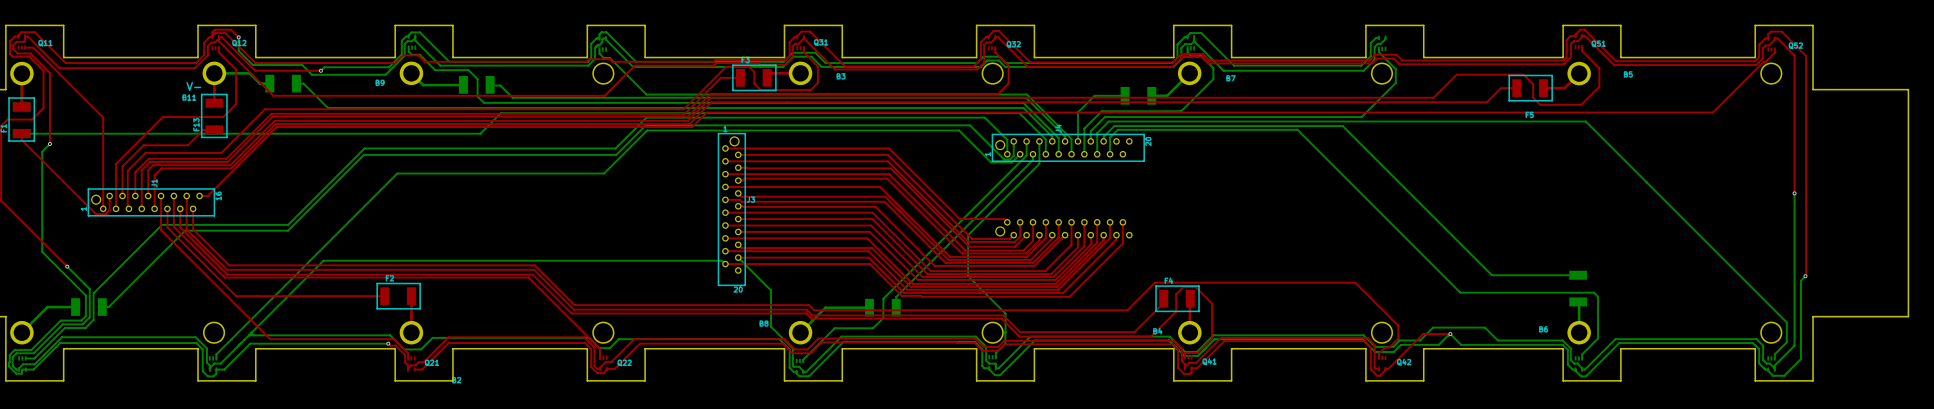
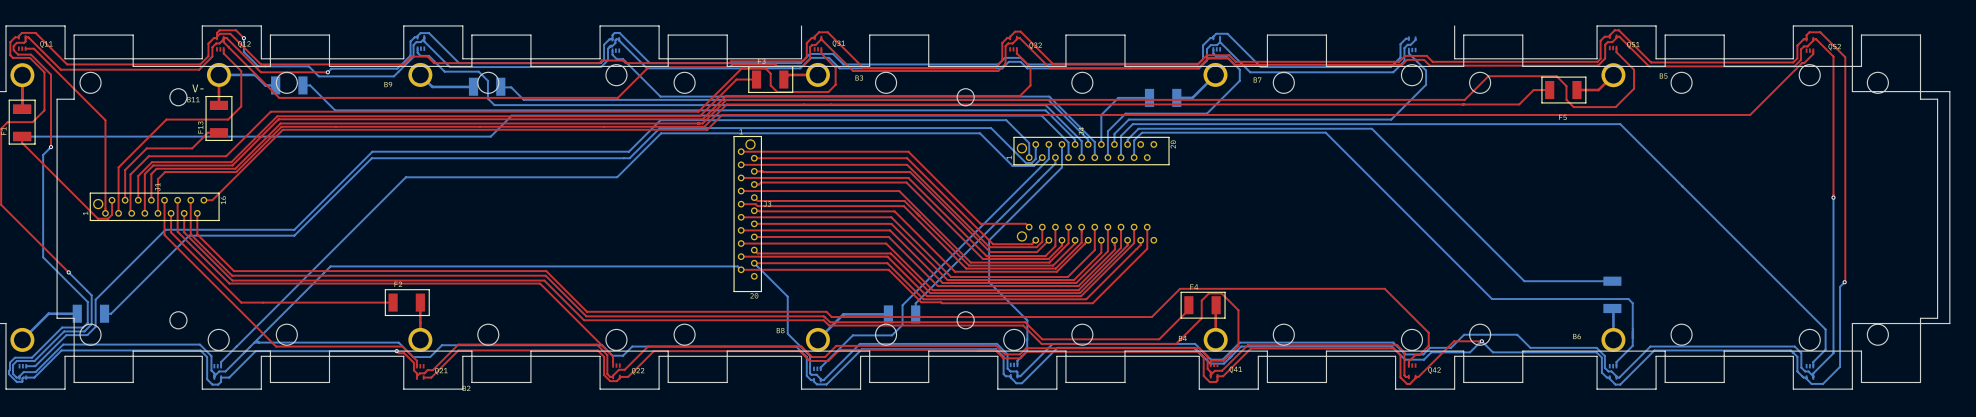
board edge: (784, 25) (842, 25) (842, 57) (976, 57) (976, 25) (1034, 25) (1034, 57) (1173, 57) (1173, 25) (1231, 25) (1231, 57) (1365, 57) (1365, 25) (1423, 25) -> none
board edge: none -> (74, 35) (133, 35) (133, 66) (270, 66) (270, 35) (329, 35) (329, 66) (471, 66) (471, 35) (530, 35) (530, 66) (668, 66) (668, 35) (727, 35) (727, 66) (869, 66) (869, 35) (928, 35) (928, 66) (1065, 66) (1065, 35) (1125, 35) (1125, 66) (1267, 66) (1267, 35) (1326, 35) (1326, 66) (1463, 66) (1463, 35) (1522, 35) (1522, 66) (1665, 66) (1665, 35) (1724, 35) (1724, 66) (1861, 66) (1861, 35) (1920, 35) (1920, 99) (1937, 99) (1937, 318) (1920, 318) (1920, 382) (1861, 382) (1861, 351) (1724, 351) (1724, 382) (1665, 382) (1665, 351) (1522, 351) (1522, 382) (1463, 382) (1463, 351) (1326, 351) (1326, 382) (1267, 382) (1267, 351) (1125, 351) (1125, 382) (1065, 382) (1065, 351) (928, 351) (928, 382) (869, 382) (869, 351) (727, 351) (727, 382) (668, 382) (668, 351) (530, 351) (530, 382) (471, 382) (471, 351) (329, 351) (329, 382) (270, 382) (270, 351) (133, 351) (133, 382) (74, 382) (74, 318) (57, 318) (57, 99) (74, 99) (74, 35)
round board edge: [981, 62, 1004, 85] -> none
round board edge: none -> [79, 71, 102, 94]
round board edge: none -> [275, 71, 298, 94]
round board edge: none -> [477, 71, 500, 94]
round board edge: none -> [673, 71, 696, 94]
round board edge: none -> [875, 71, 898, 94]
round board edge: none -> [1071, 71, 1094, 94]
round board edge: none -> [1272, 71, 1295, 94]
round board edge: none -> [1469, 71, 1492, 94]
round board edge: none -> [1670, 71, 1693, 94]
round board edge: none -> [1866, 71, 1889, 94]
round board edge: none -> [169, 88, 188, 107]
round board edge: none -> [956, 88, 975, 107]
round board edge: none -> [169, 311, 188, 330]
round board edge: none -> [956, 311, 975, 330]
round board edge: none -> [79, 323, 102, 346]
round board edge: none -> [275, 323, 298, 346]
round board edge: none -> [477, 323, 500, 346]
round board edge: none -> [673, 323, 696, 346]
round board edge: none -> [875, 323, 898, 346]
round board edge: none -> [1071, 323, 1094, 346]
round board edge: none -> [1272, 323, 1295, 346]
round board edge: none -> [1469, 323, 1492, 346]
round board edge: none -> [1670, 323, 1693, 346]
round board edge: none -> [1866, 323, 1889, 346]

